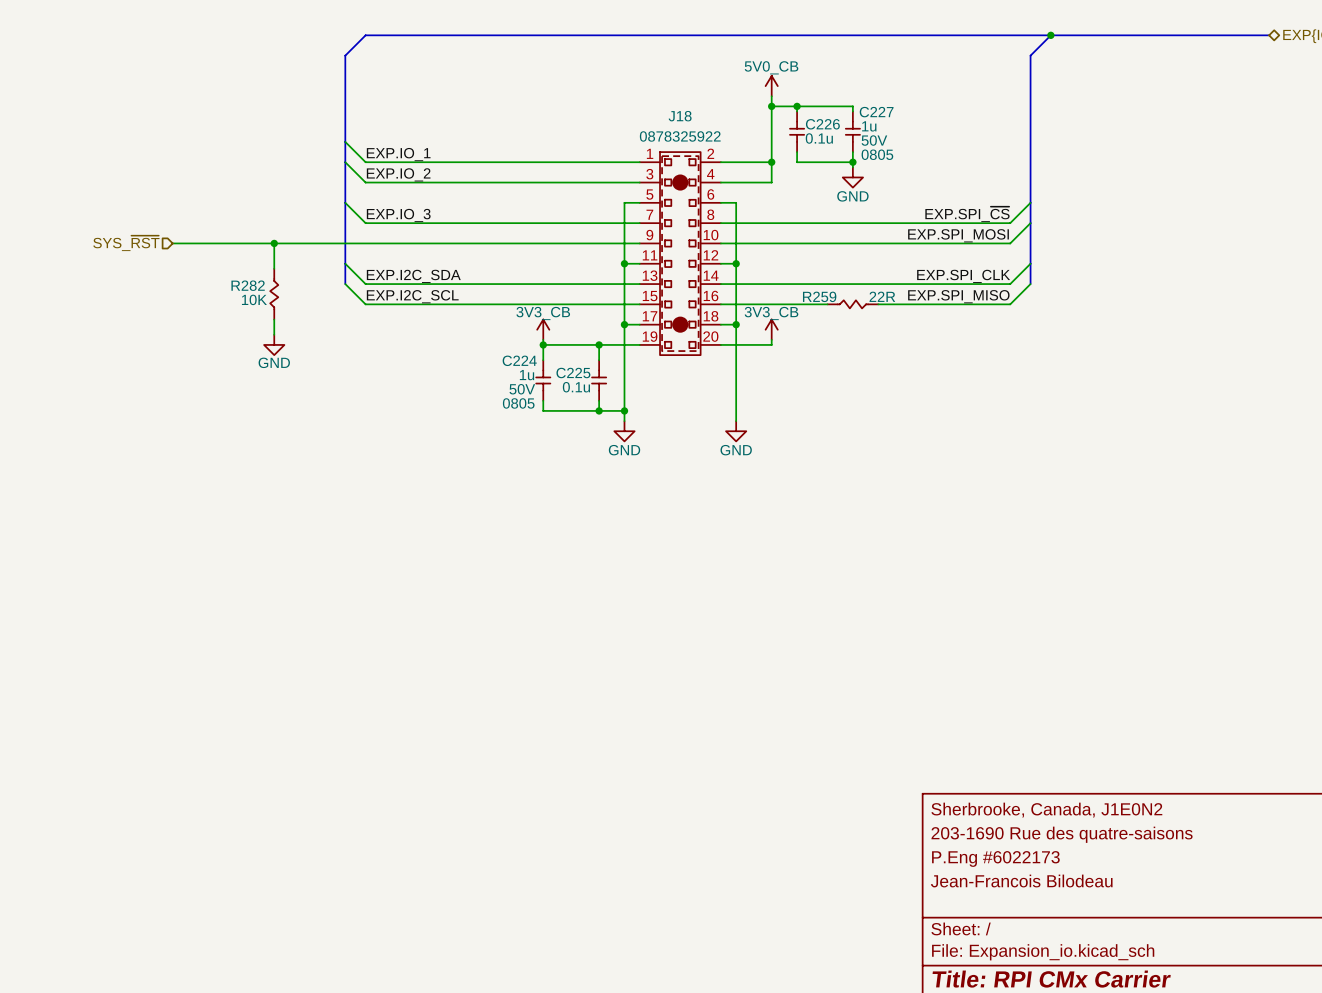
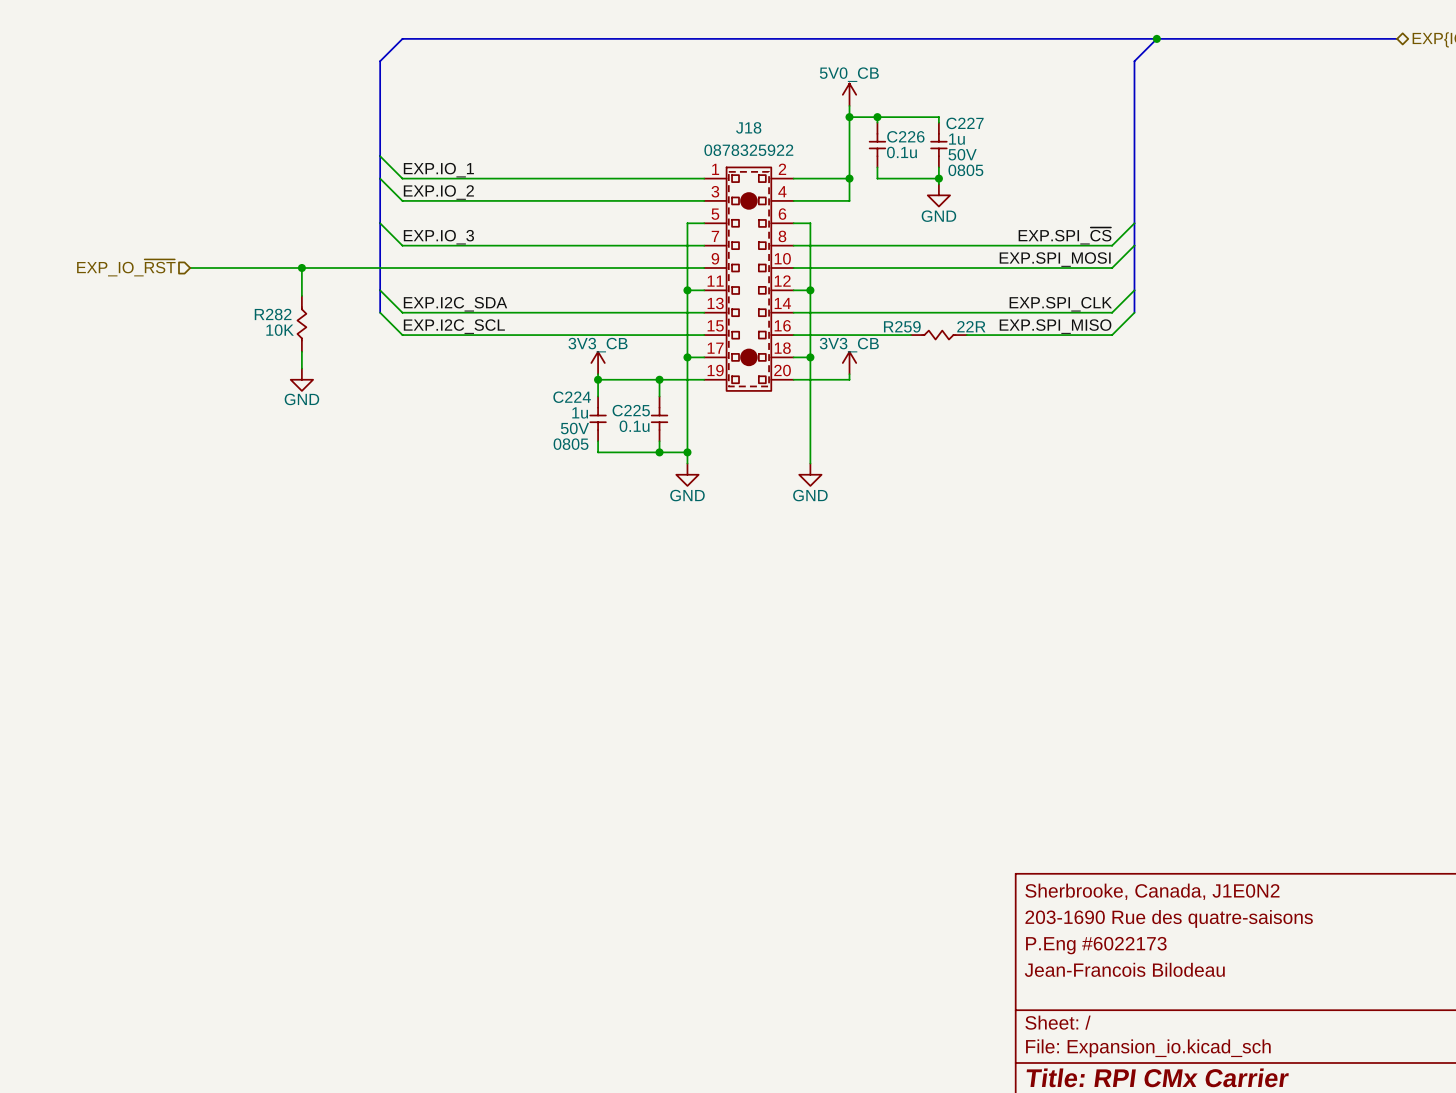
hierarchical label: SYS_~{RST} (126, 243) -> EXP_IO_~{RST} (126, 267)

